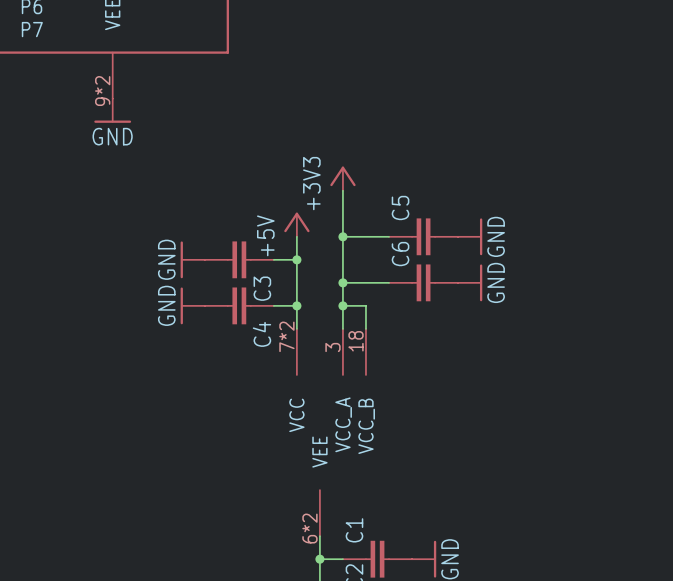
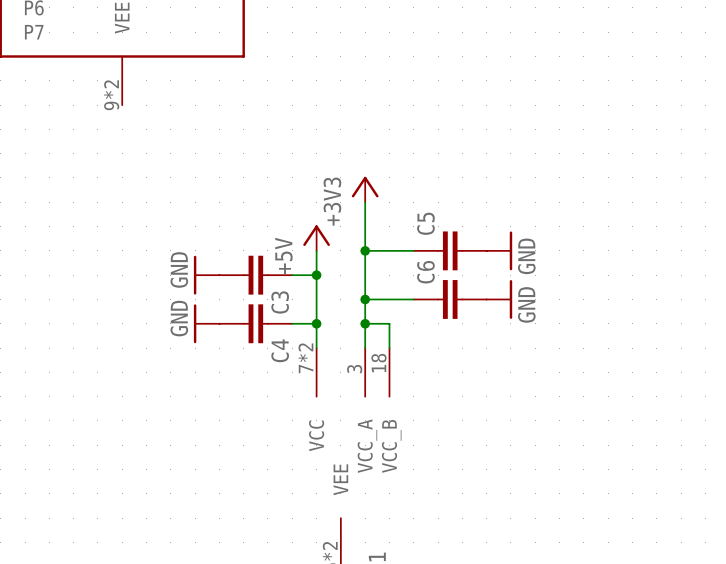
power symbol: GND (112, 110) -> none

